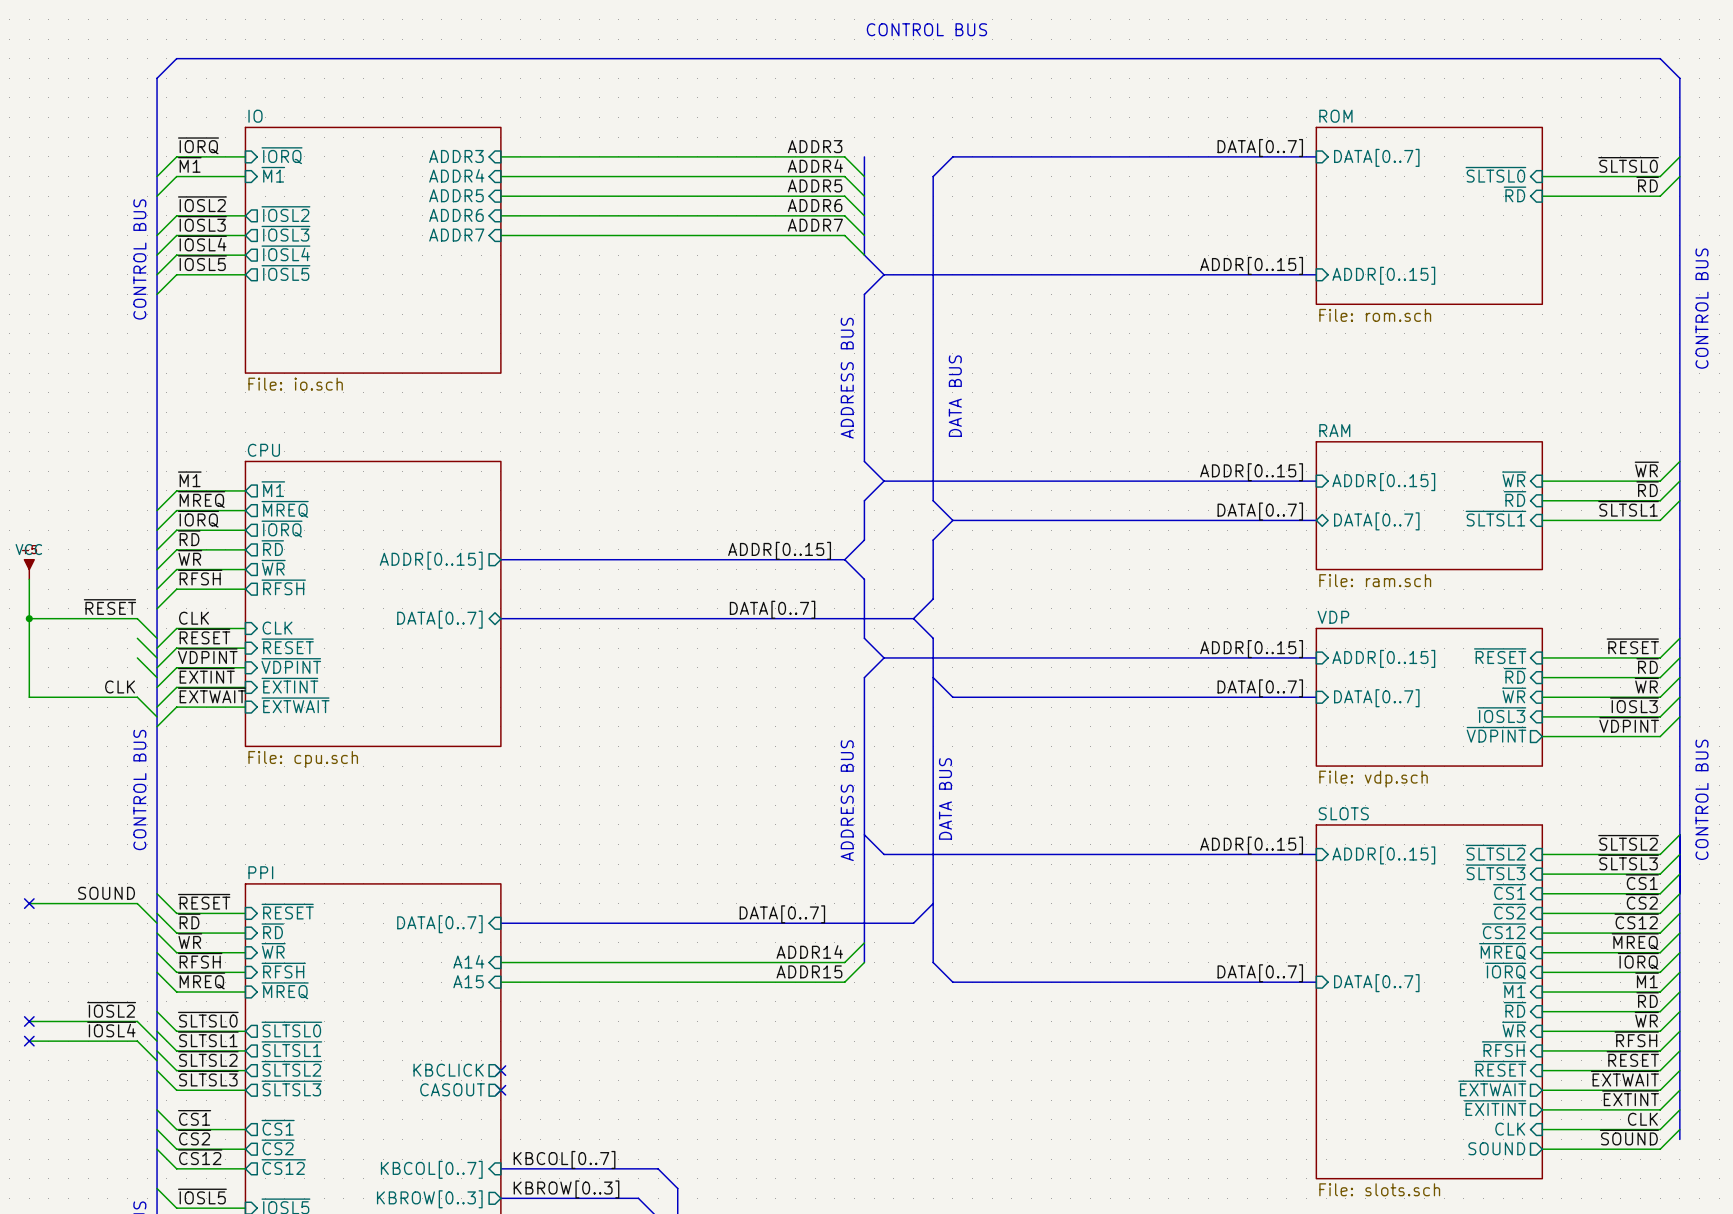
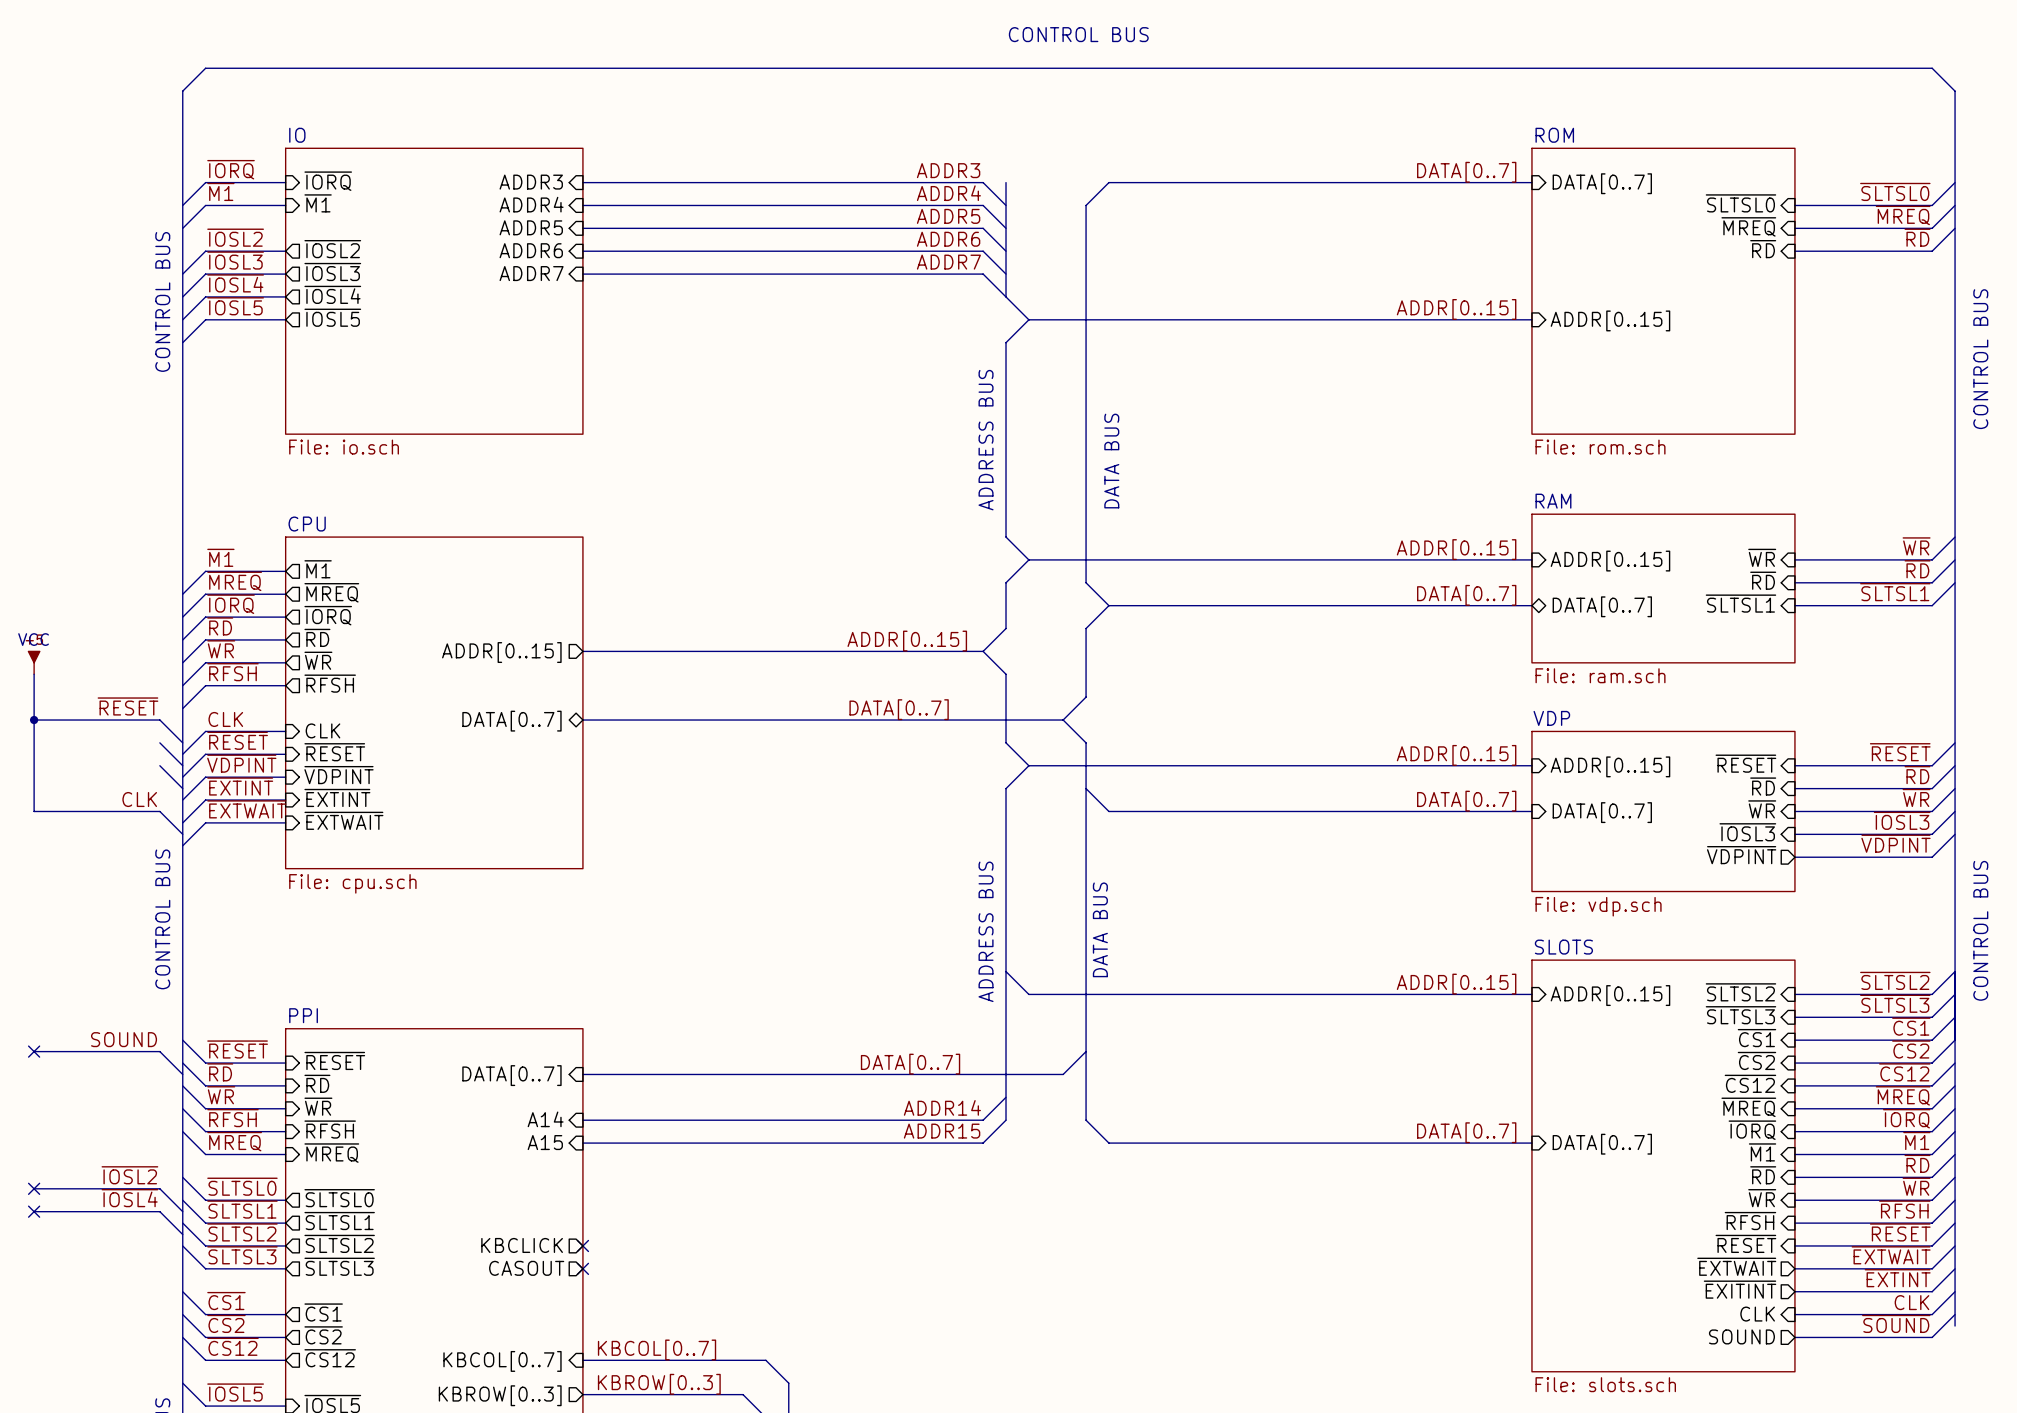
label: ~{RD} (1647, 184) -> ~{MREQ} (1903, 215)
sheet pin: ~{RD} (1515, 194) -> ~{MREQ} (1748, 226)
wire: none -> (1955, 228) (1932, 251) (1794, 251)
label: none -> ~{RD} (1917, 237)
sheet pin: none -> ~{RD} (1763, 249)
sheet ROM: File: rom.sch (1429, 215) -> none
sheet ROM: none -> File: rom.sch (1663, 291)

